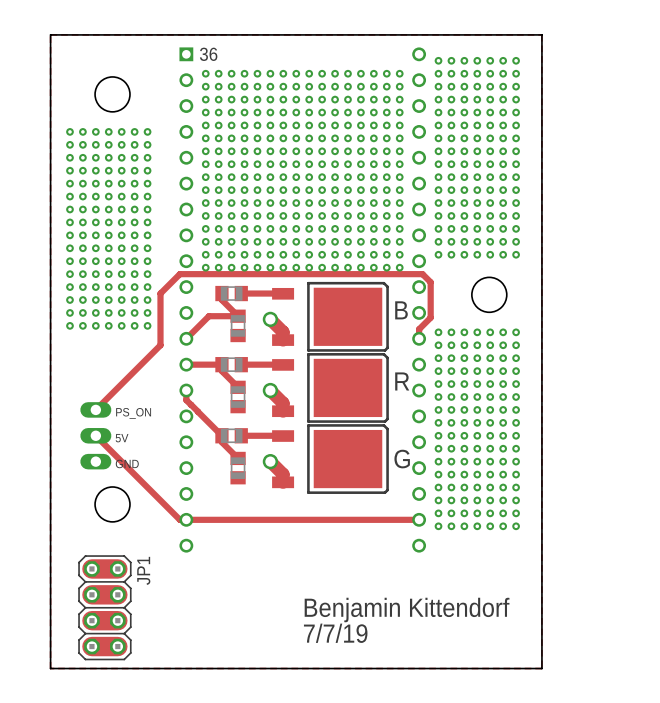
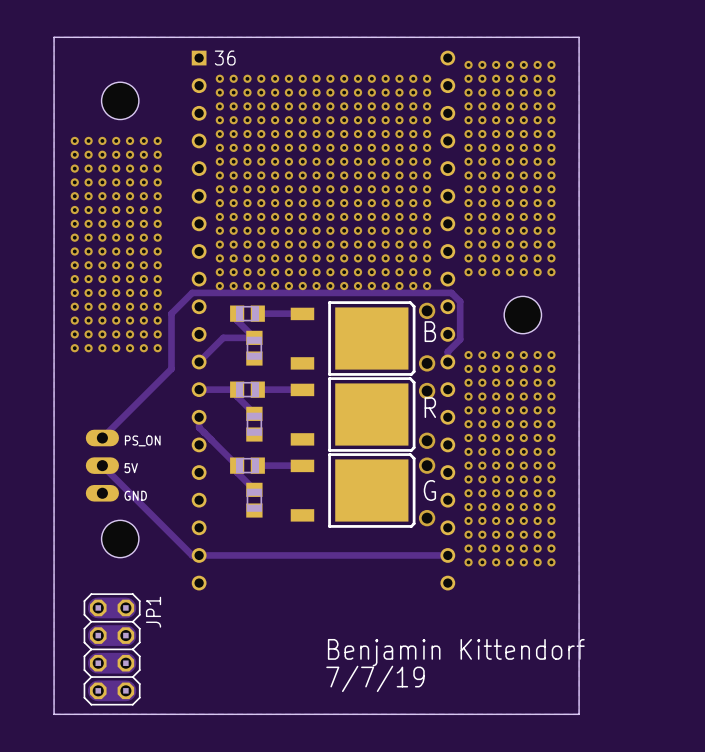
via: none -> (427, 310)
track: (270, 319) (283, 332) (283, 340) -> none
via: (270, 319) -> none
via: none -> (427, 363)
via: none -> (427, 391)
track: (270, 390) (283, 403) (283, 411) -> none
via: (270, 390) -> none
via: none -> (427, 440)
via: none -> (427, 465)
track: (270, 461) (283, 474) (283, 482) -> none
via: (270, 461) -> none
via: none -> (427, 518)

